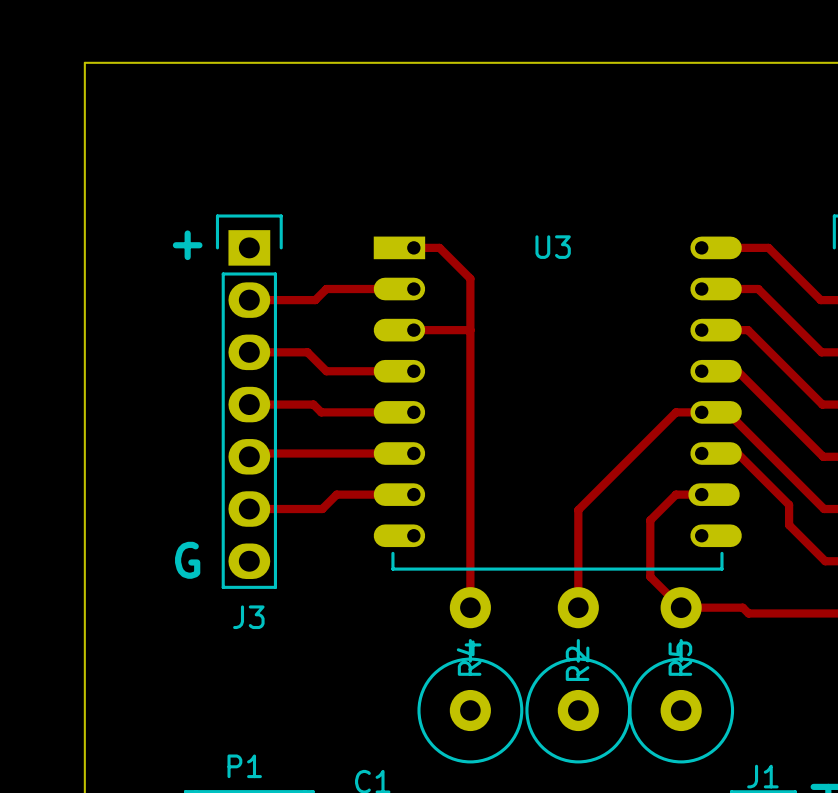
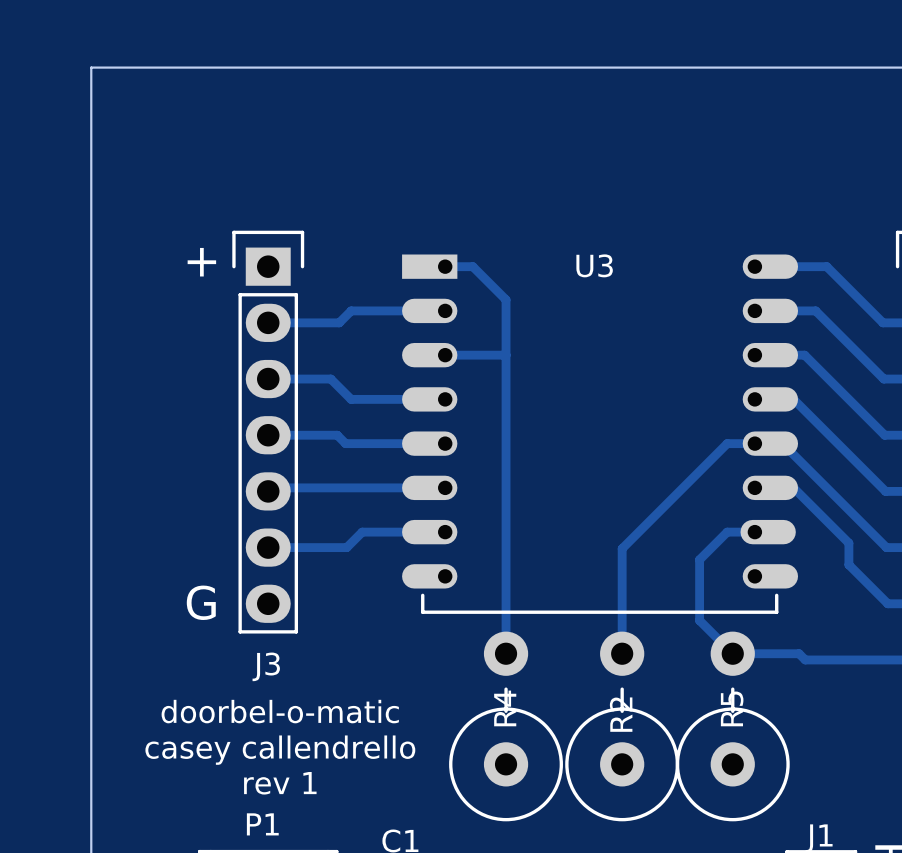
text: none -> doorbel-o-matic (280, 711)
text: none -> casey callendrello (280, 750)
text: none -> rev 1 (280, 783)

